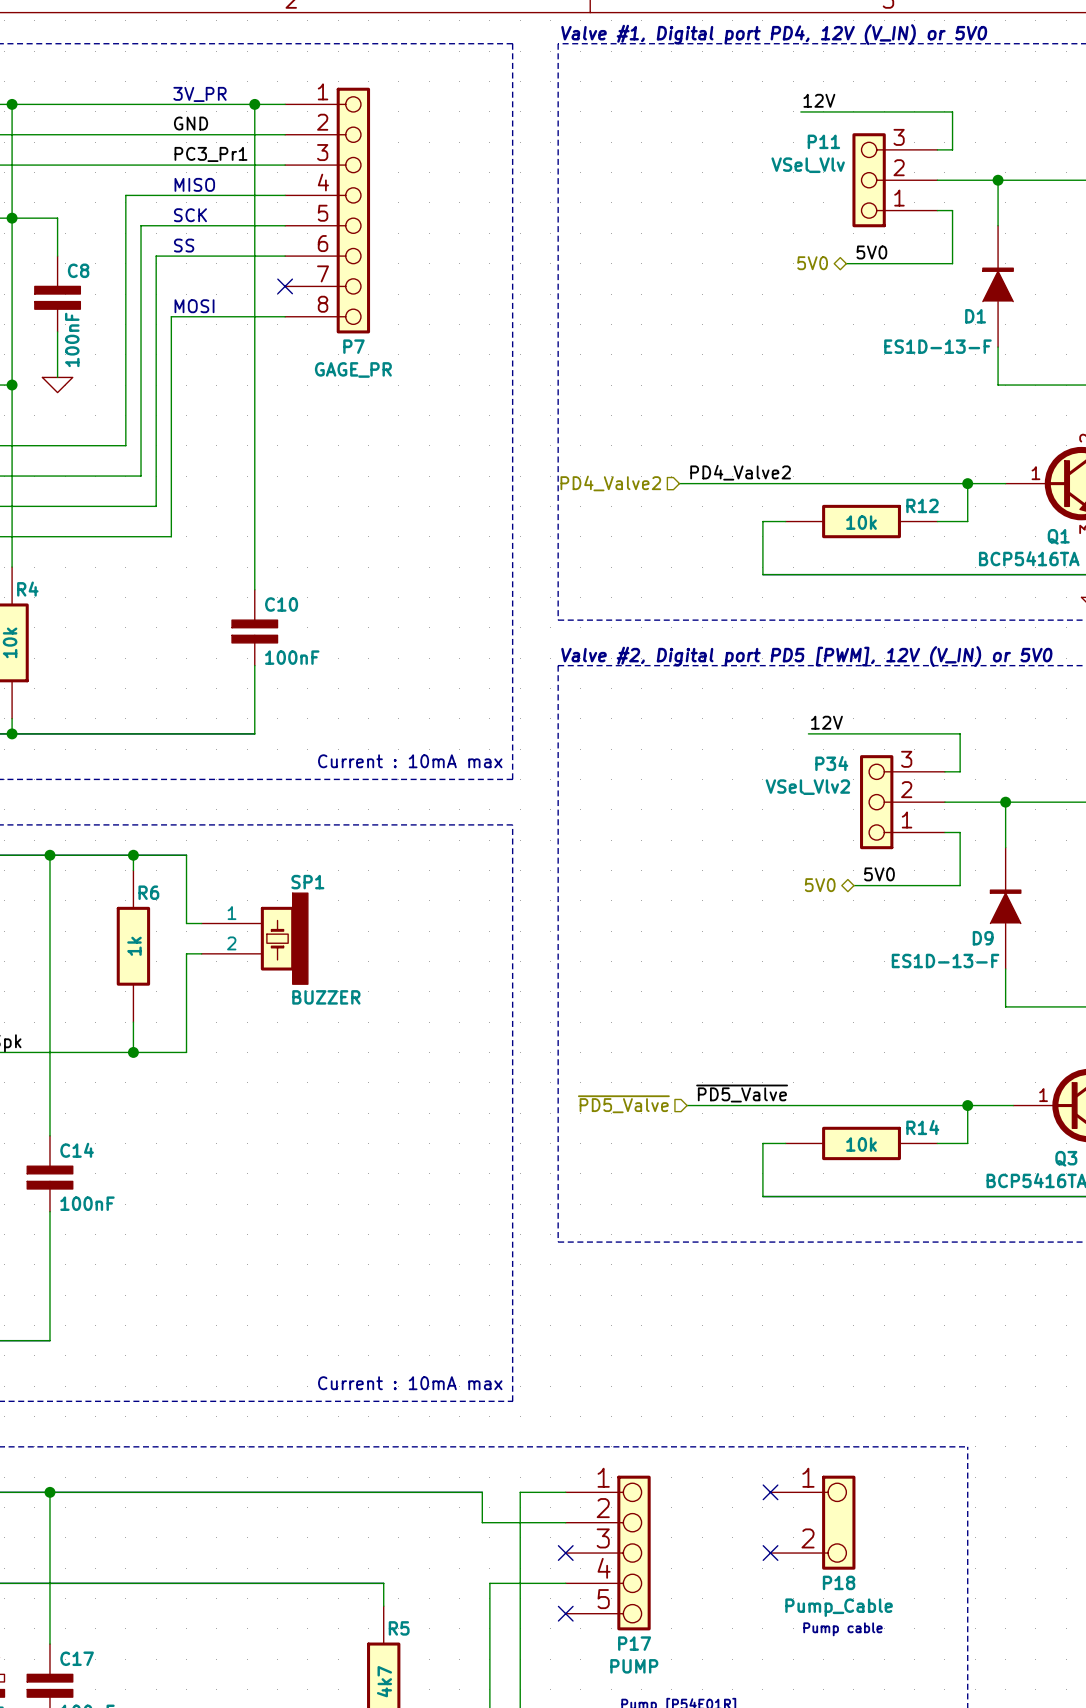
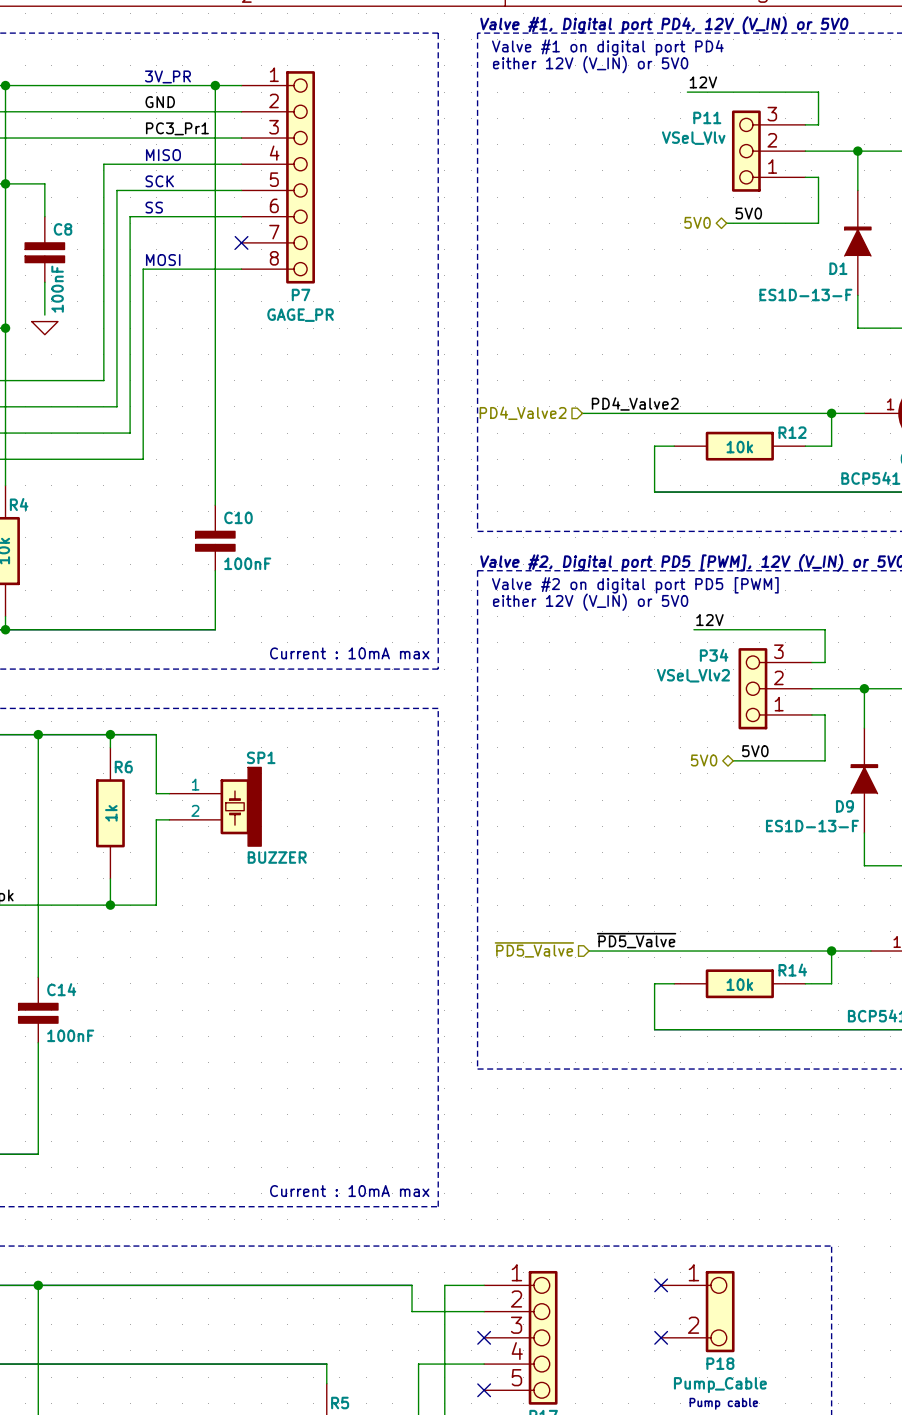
text: none -> Valve #1 on digital port PD4 (607, 47)
text: none -> either 12V (V_IN) or 5V0 (590, 64)
wire: (57, 369) (57, 377) -> none
text: none -> Valve #2 on digital port PD5 [PWM] (635, 585)
text: none -> either 12V (V_IN) or 5V0 (590, 602)

